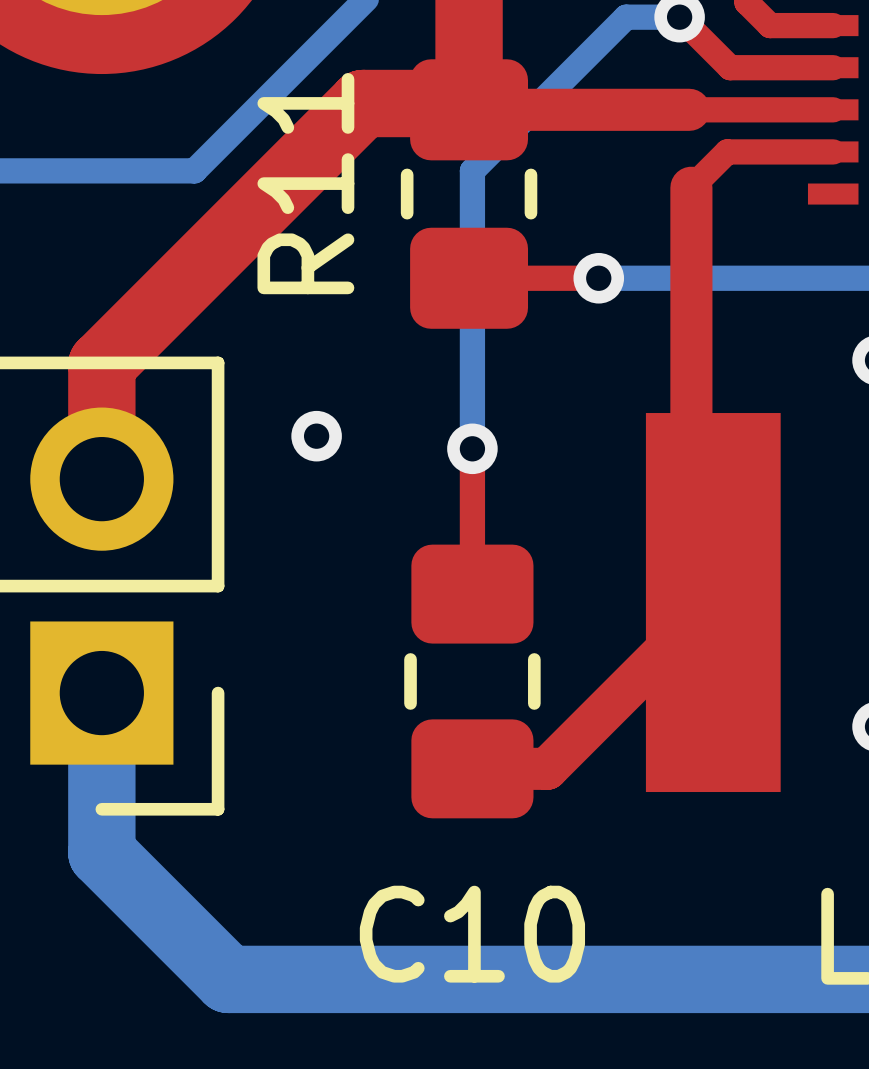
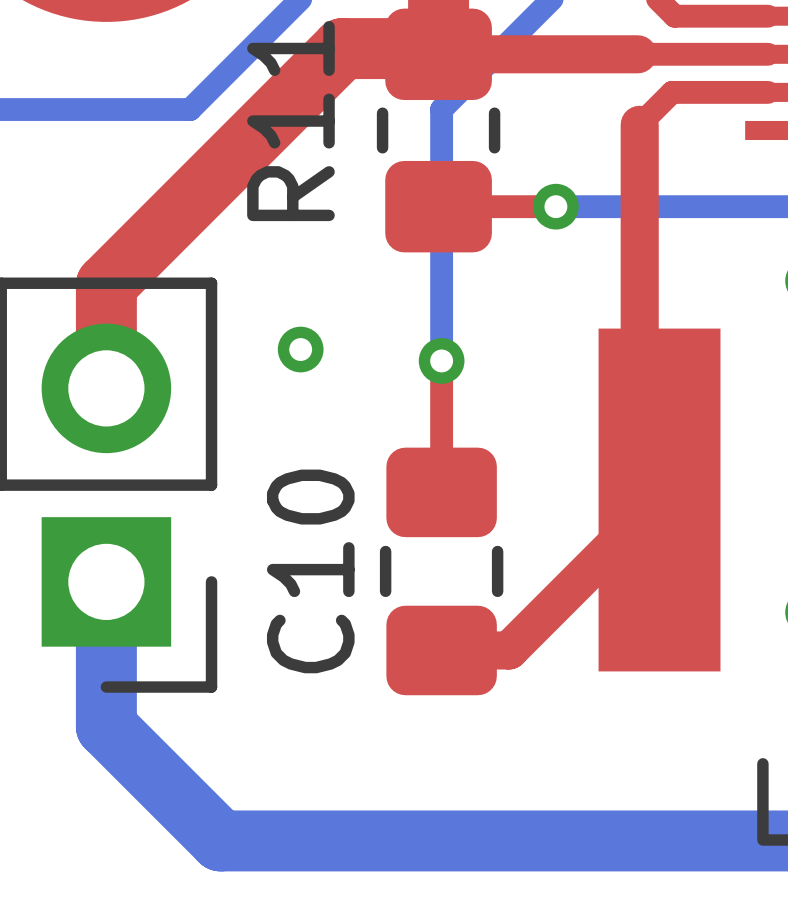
C10 name rotation: 0° (472, 934) -> 90° counterclockwise (310, 571)

